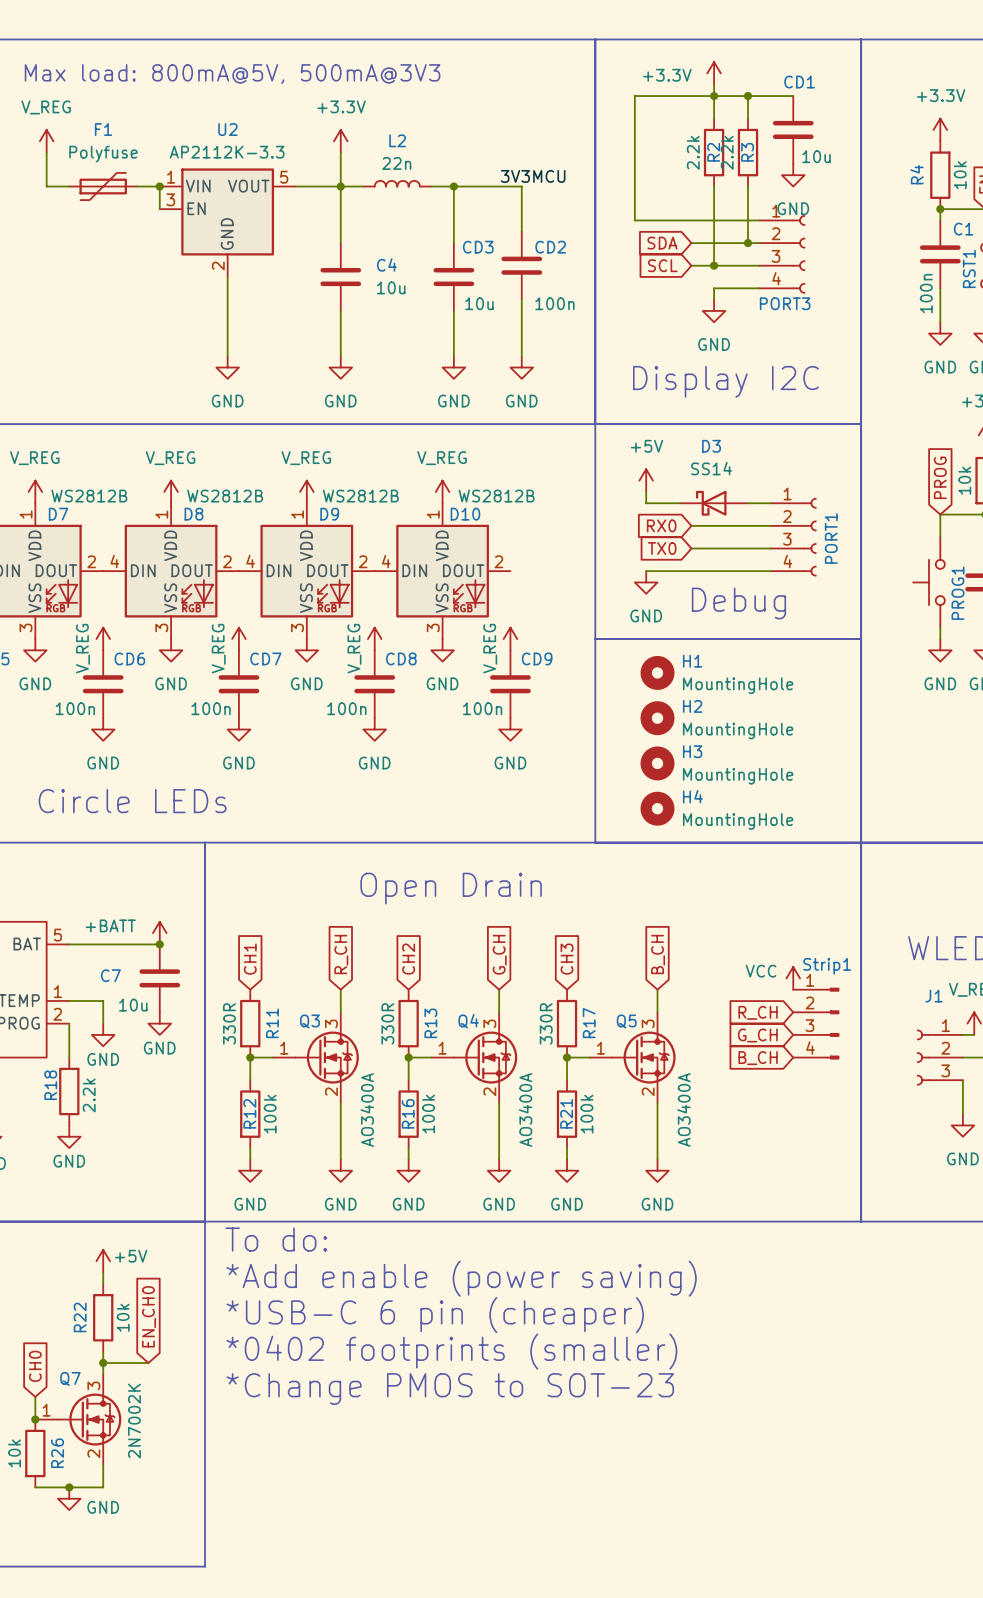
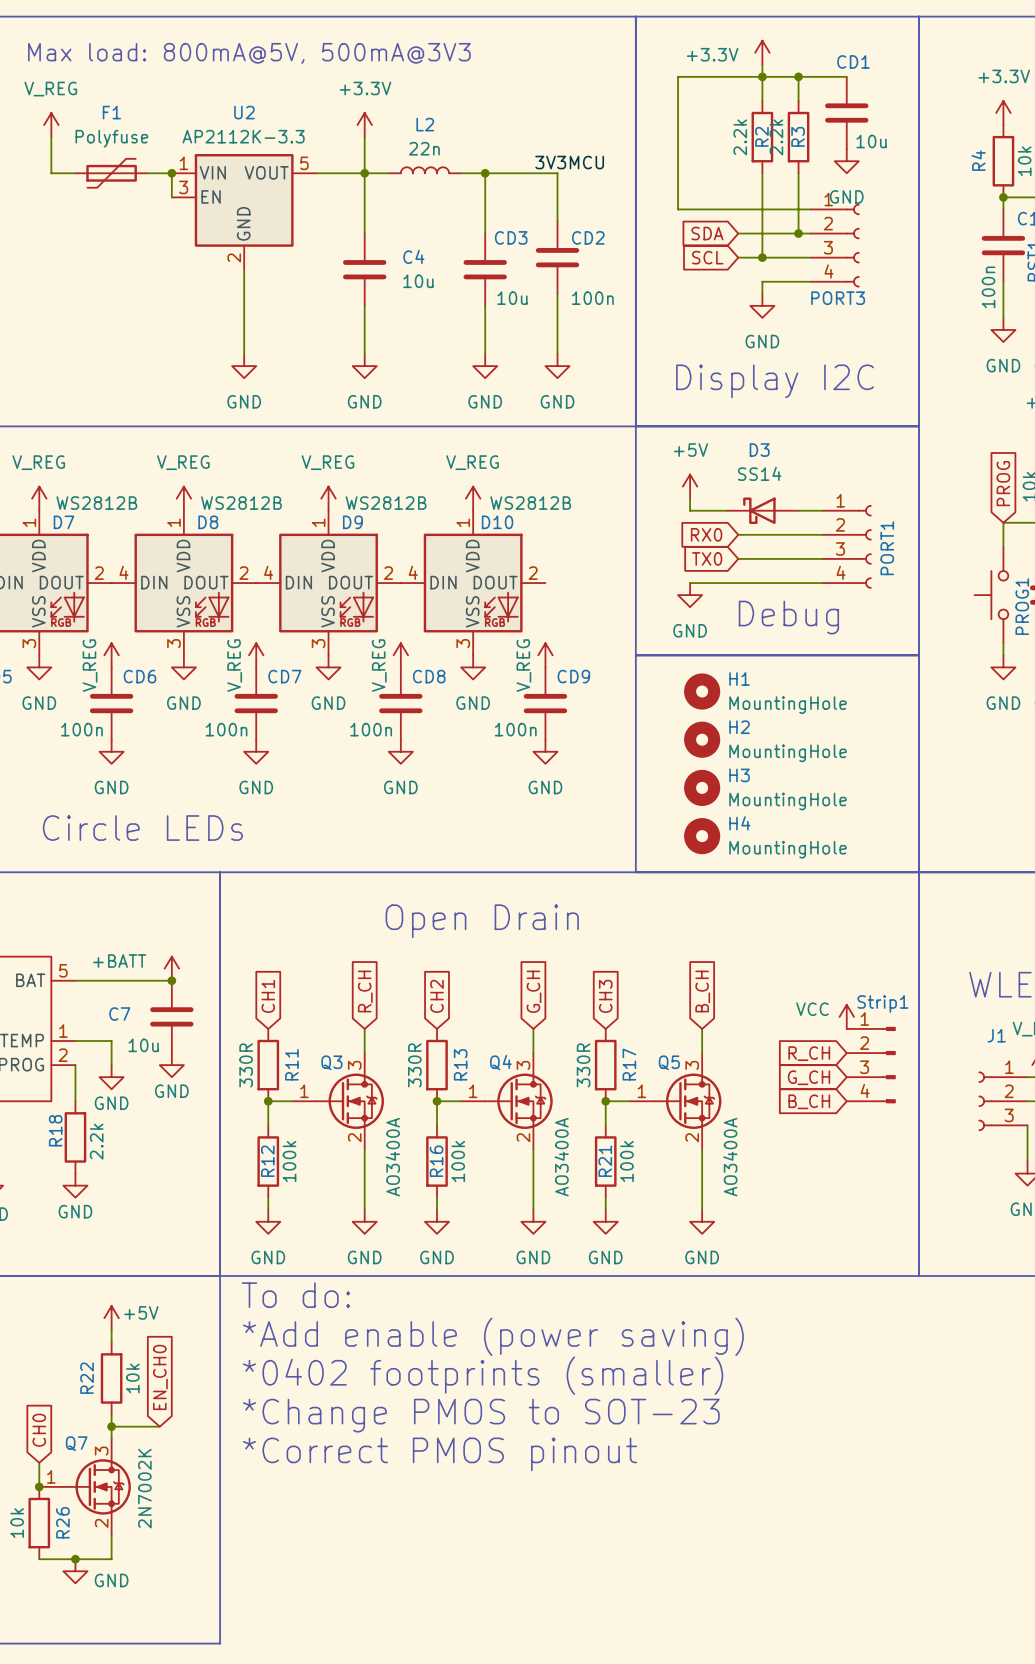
text: *USB-C 6 pin (cheaper) (435, 1315) -> *0402 footprints (smaller) (483, 1375)
text: *0402 footprints (smaller) (451, 1351) -> *Change PMOS to SOT-23 (481, 1415)
text: *Change PMOS to SOT-23 (450, 1389) -> *Correct PMOS pinout (440, 1454)

